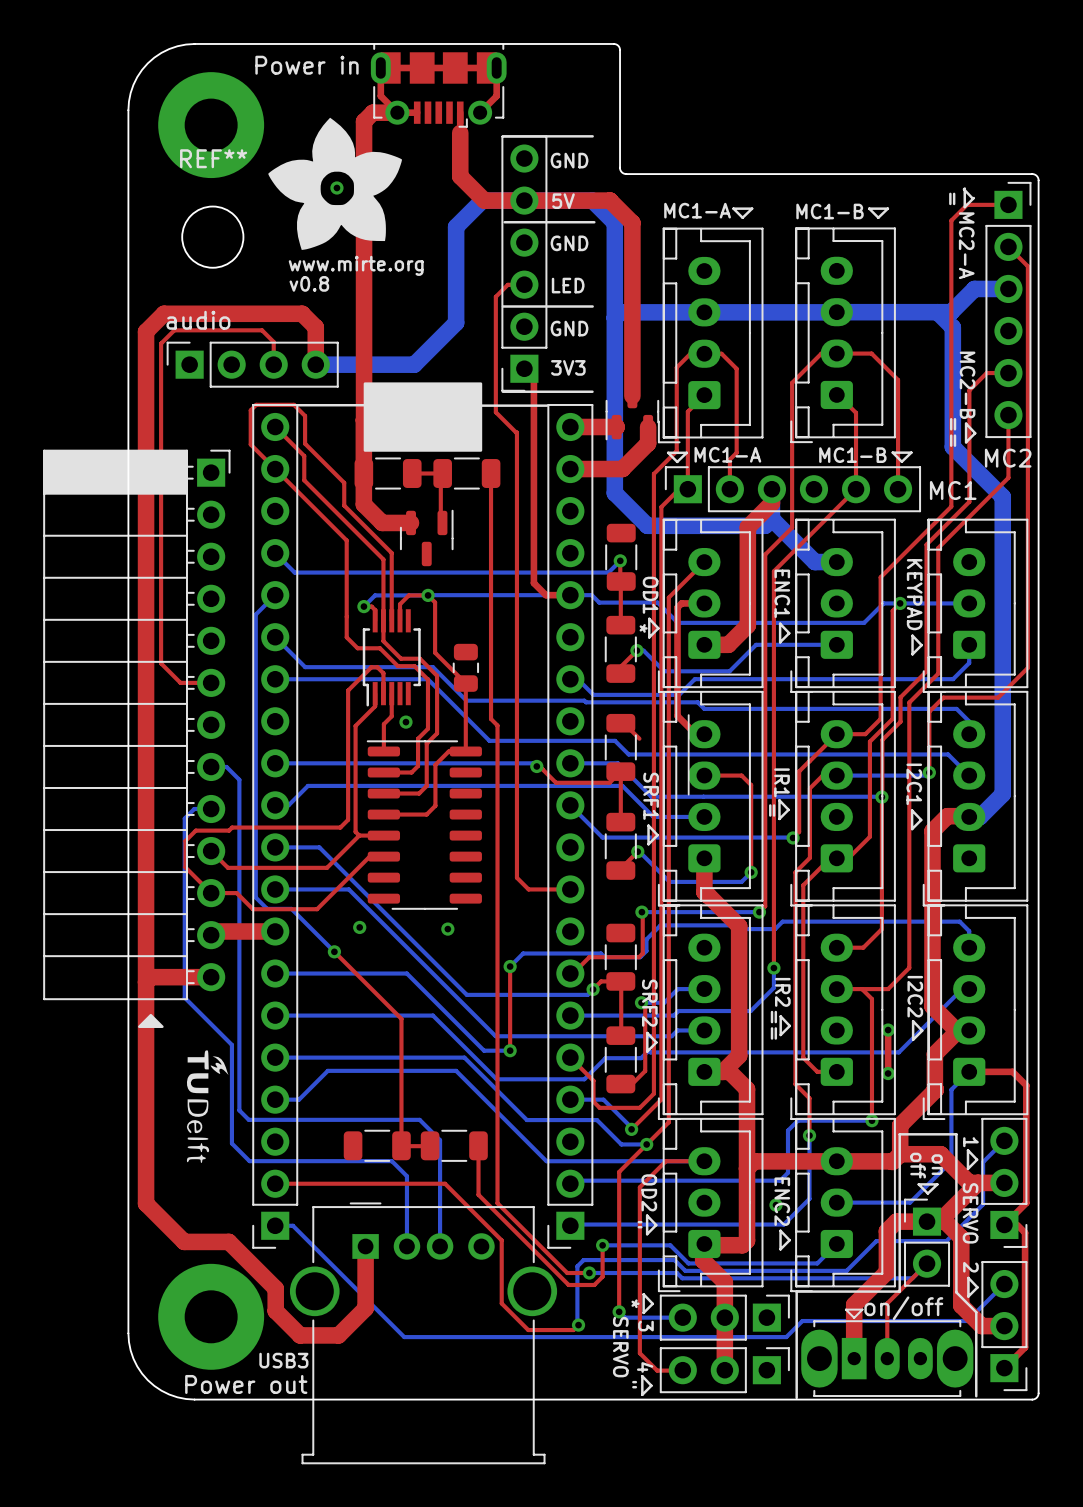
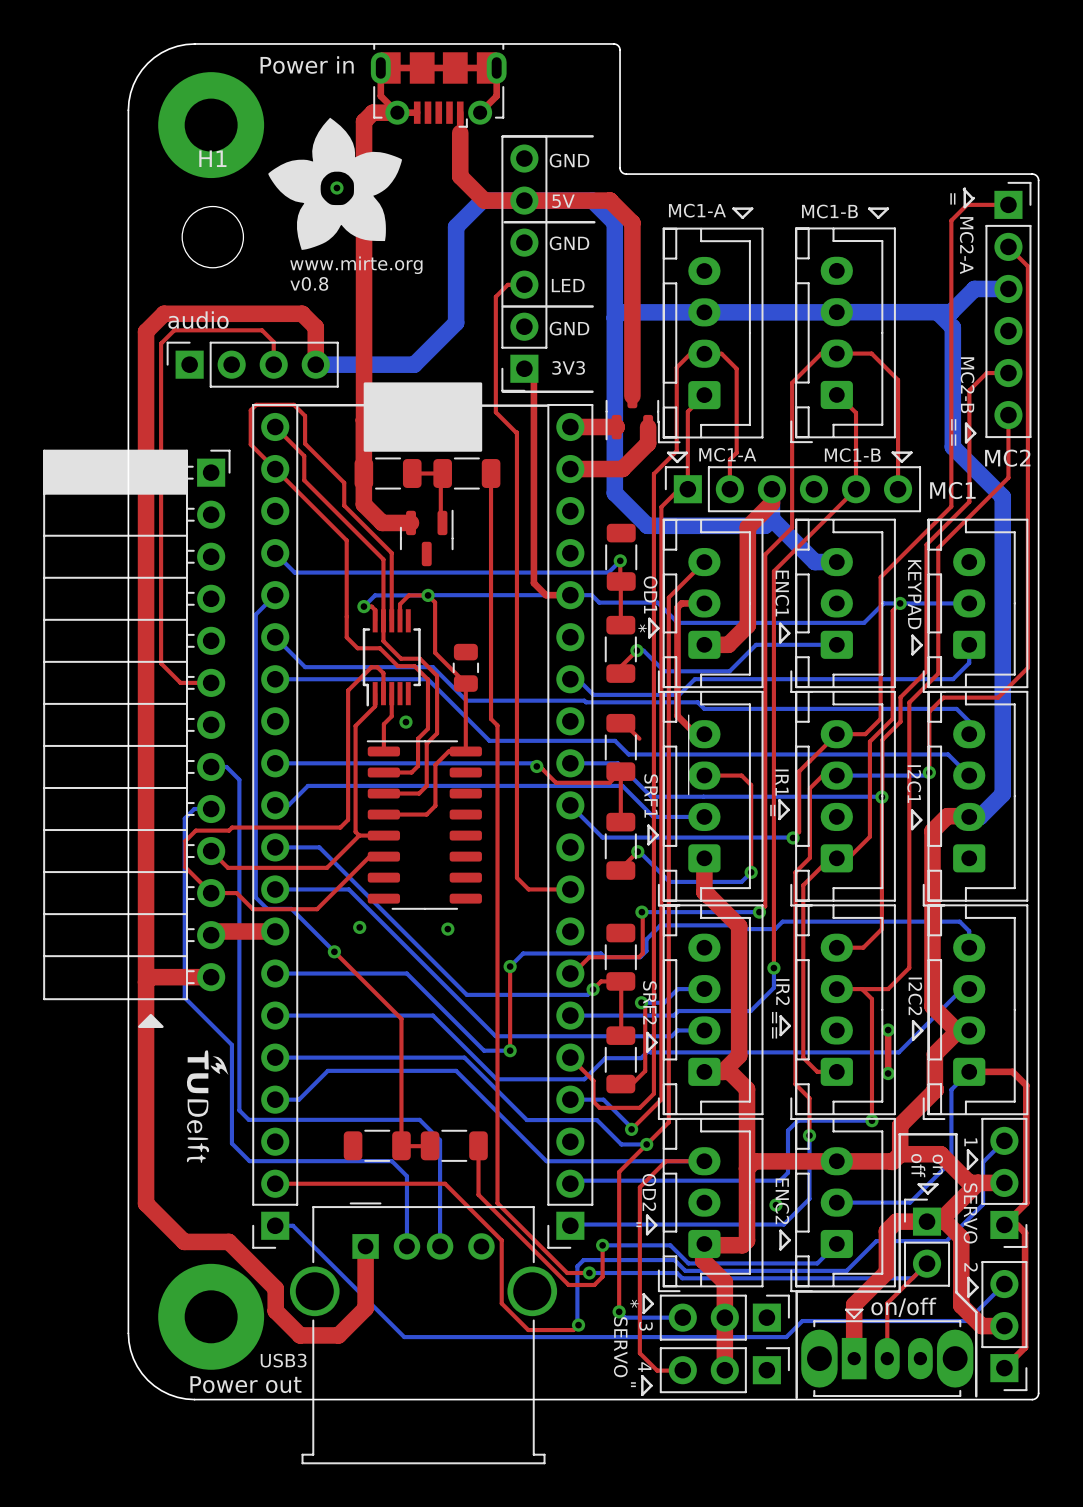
REF** name: REF** (213, 158) -> H1 (212, 158)

